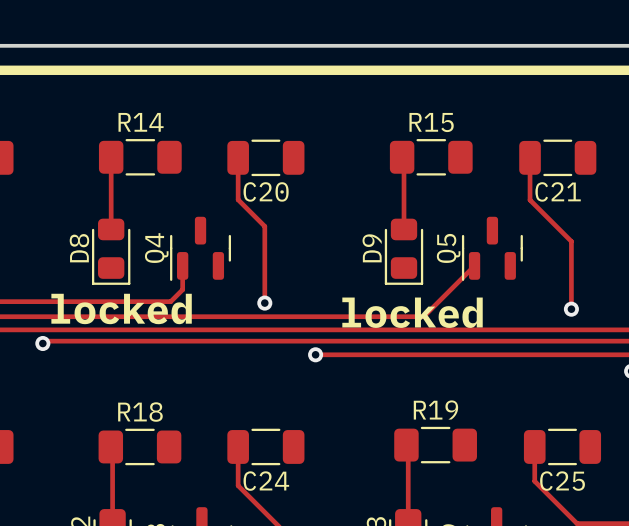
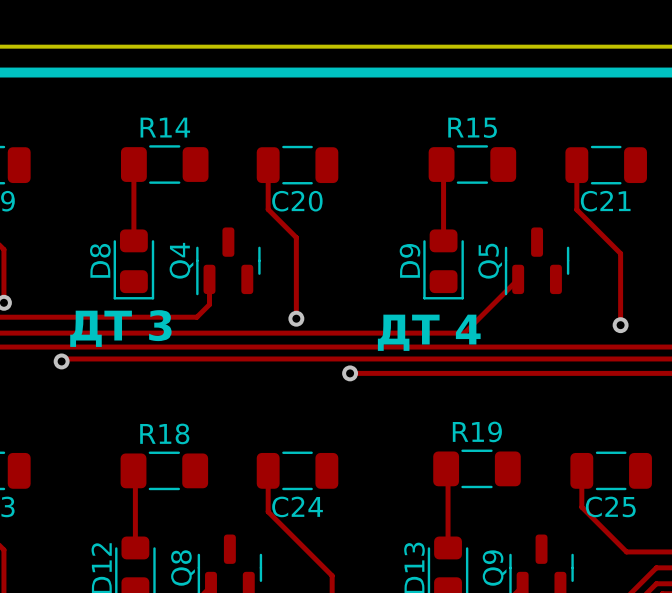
text: locked (121, 308) -> ДТ 3 (120, 328)
text: locked (412, 312) -> ДТ 4 (429, 332)

